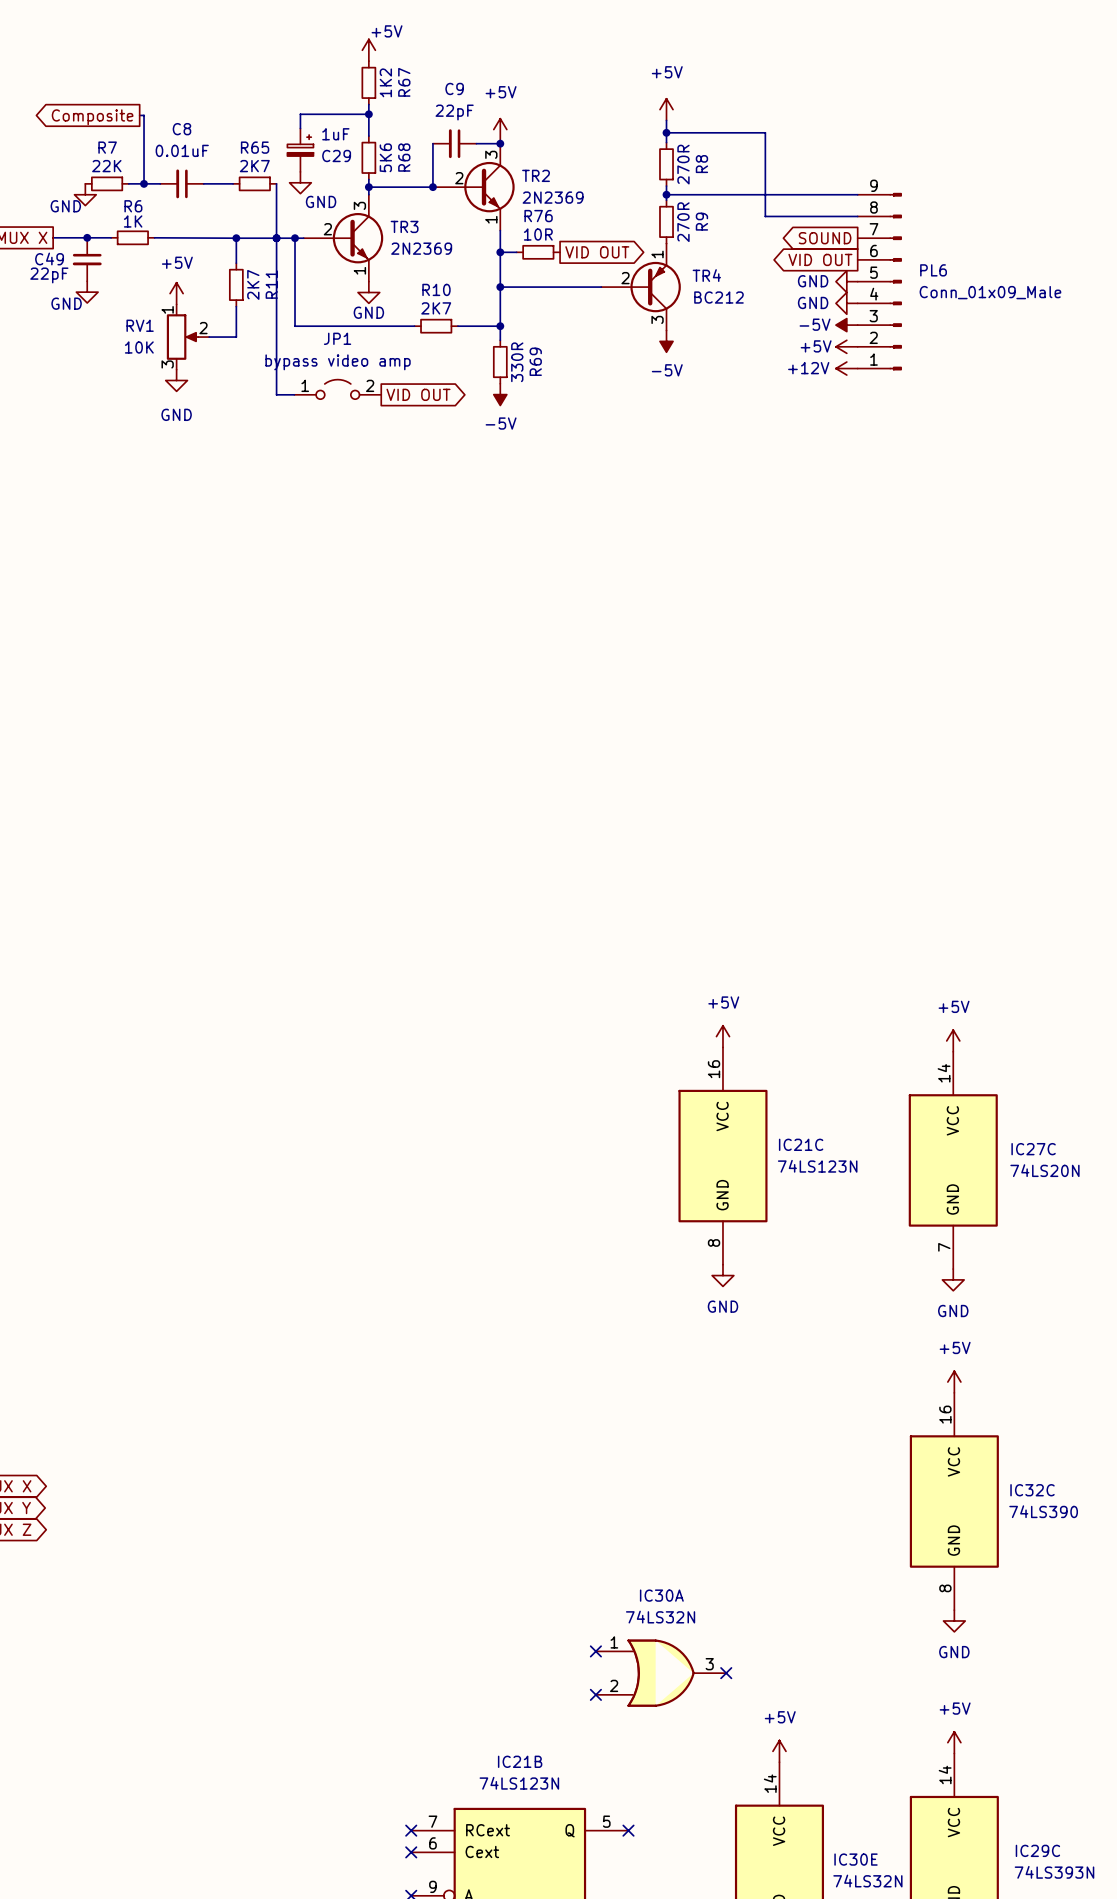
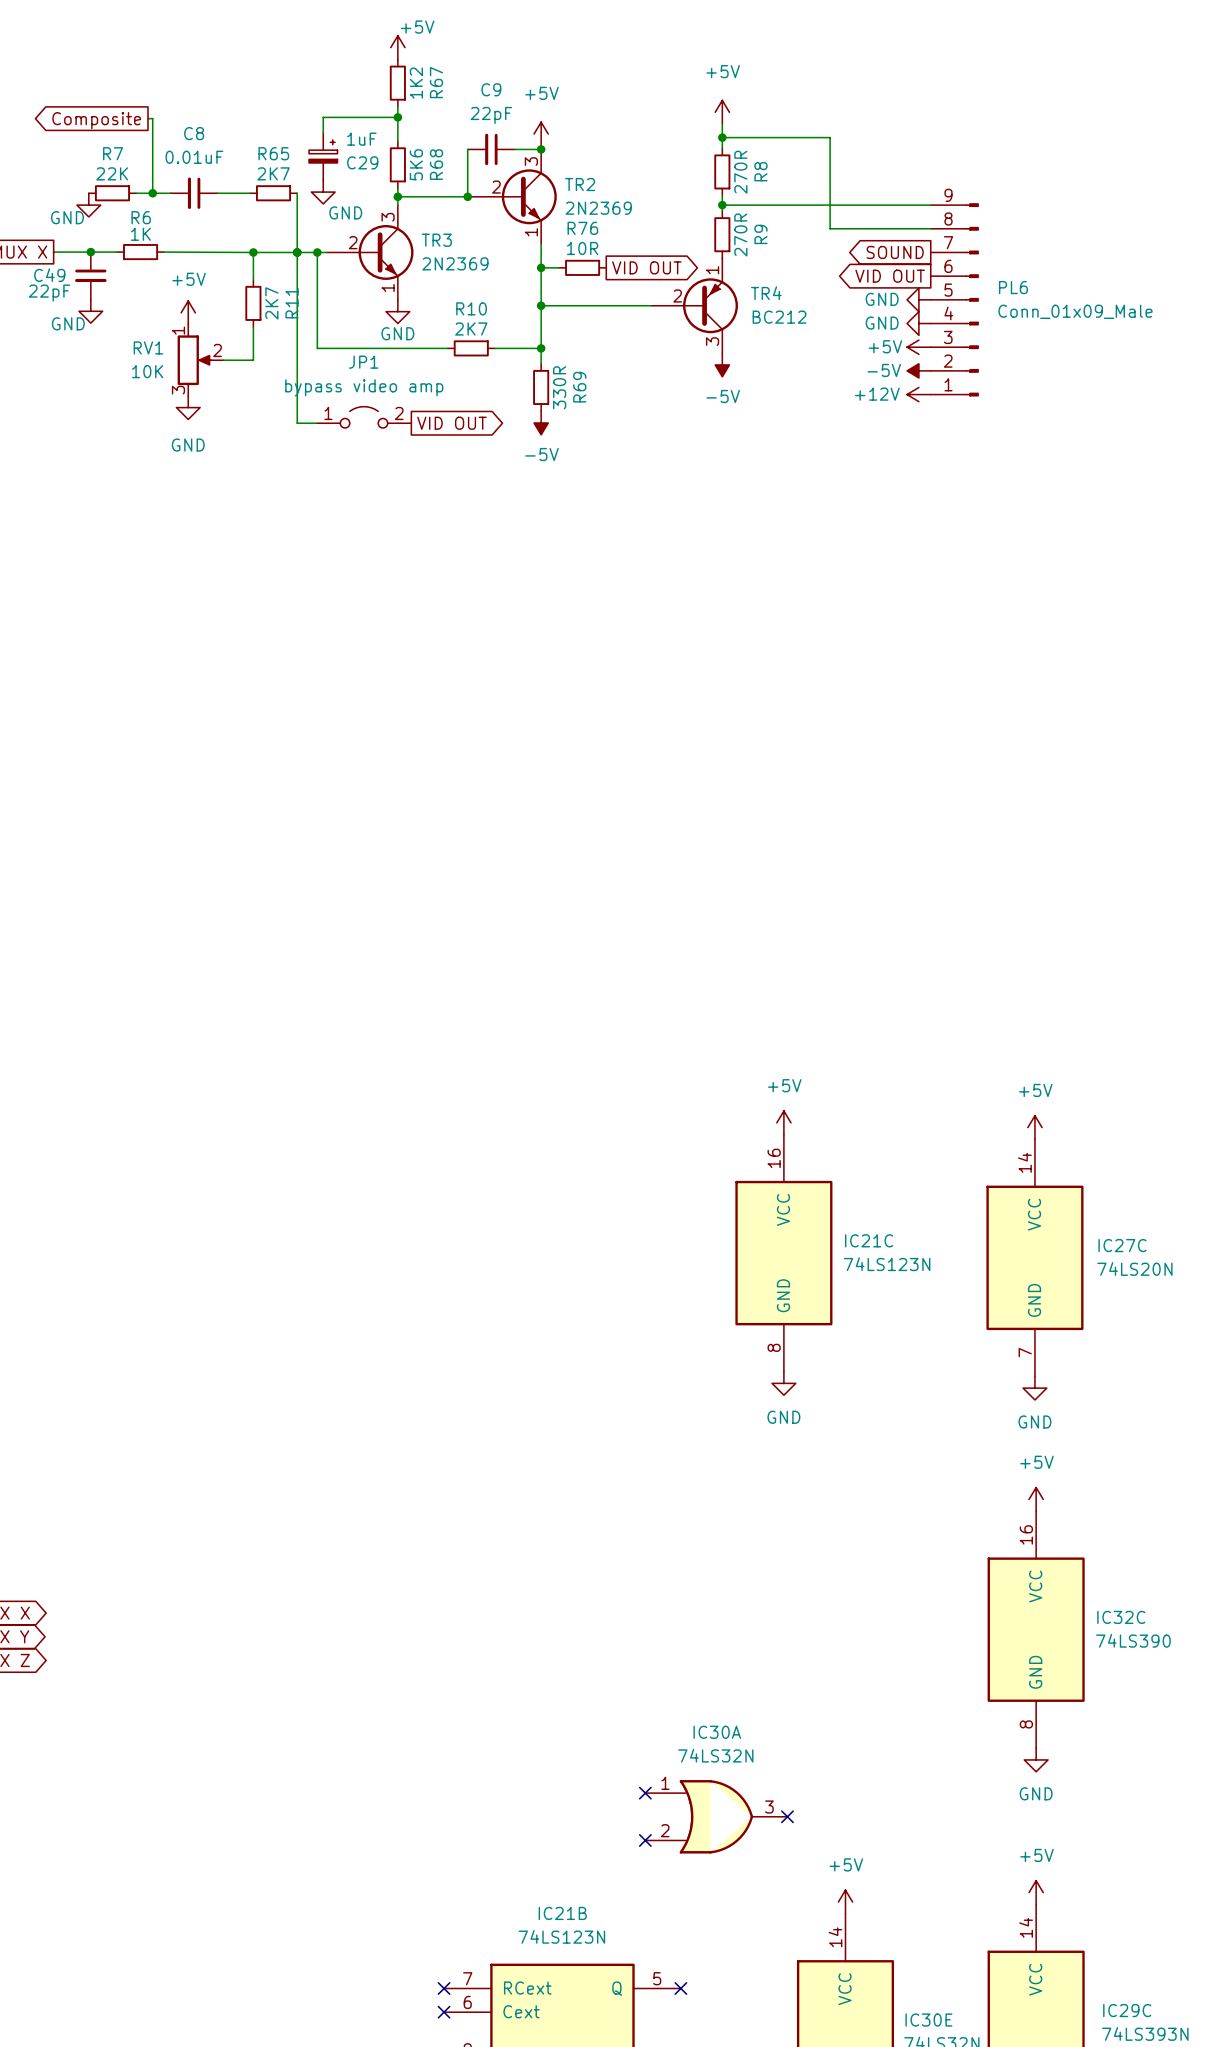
power symbol: -5V (846, 325) -> +5V (918, 347)
power symbol: +5V (846, 346) -> -5V (918, 370)

